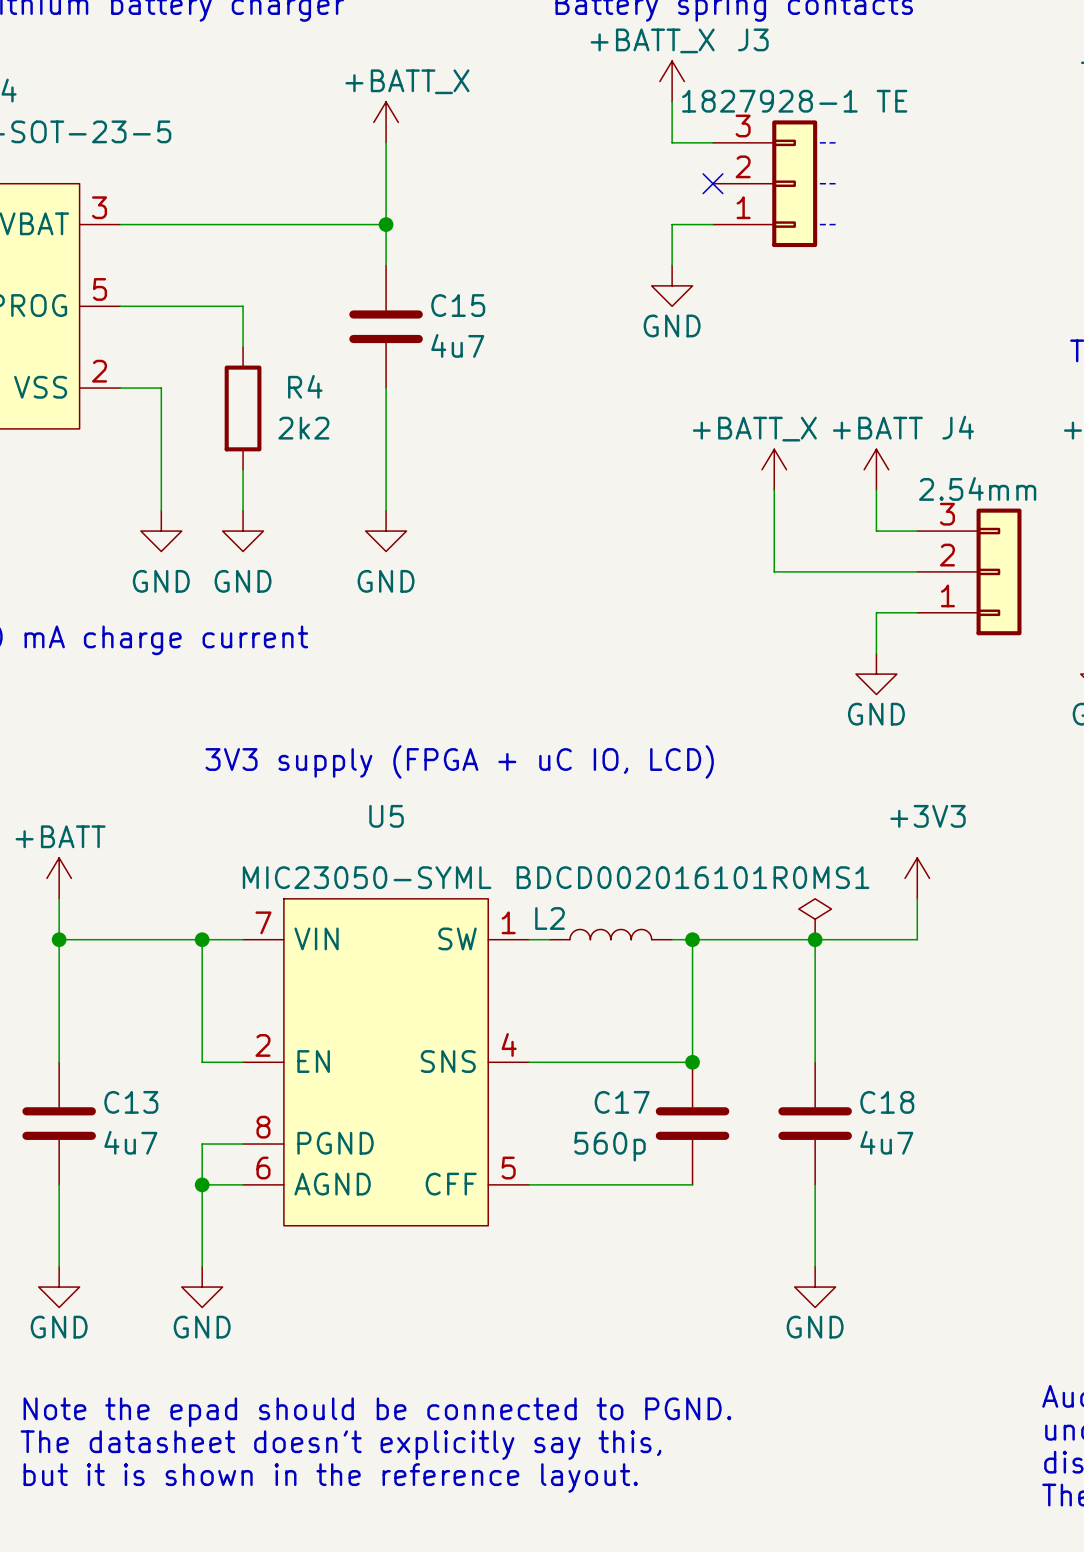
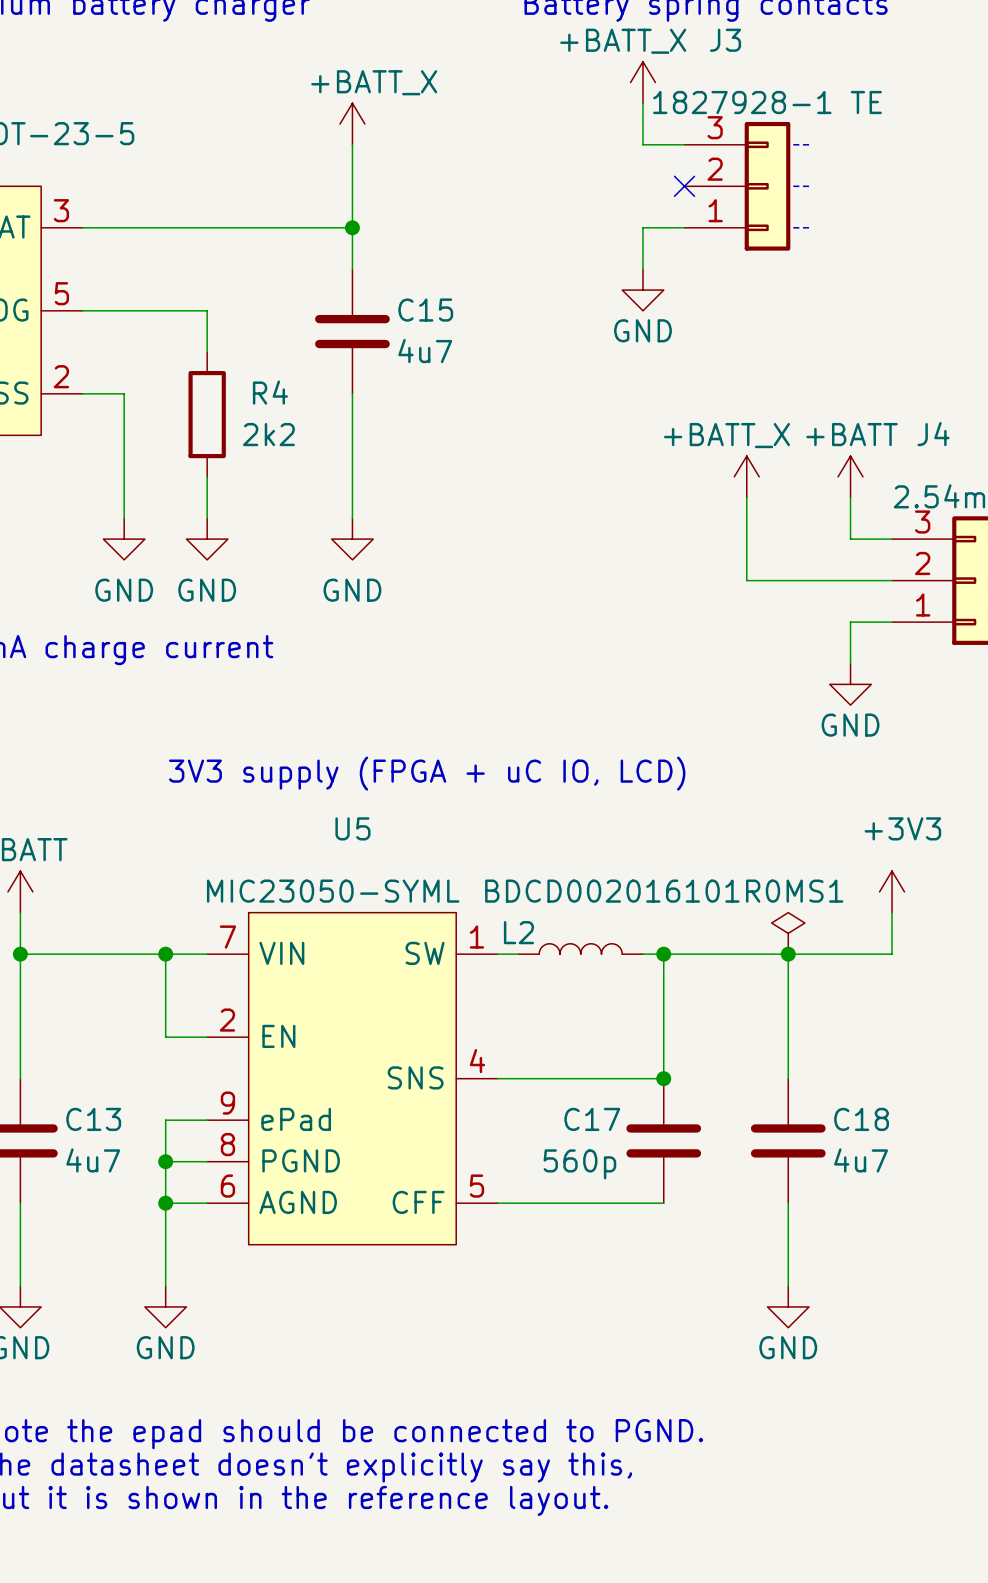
U5 symbol: [243, 898, 530, 1226] -> [207, 912, 498, 1245]
wire: (202, 1021) (202, 1062) (243, 1062) -> (165, 1037) (207, 1037)
wire: none -> (207, 1120) (165, 1120) (165, 1161)
junction: none -> (165, 1161)

